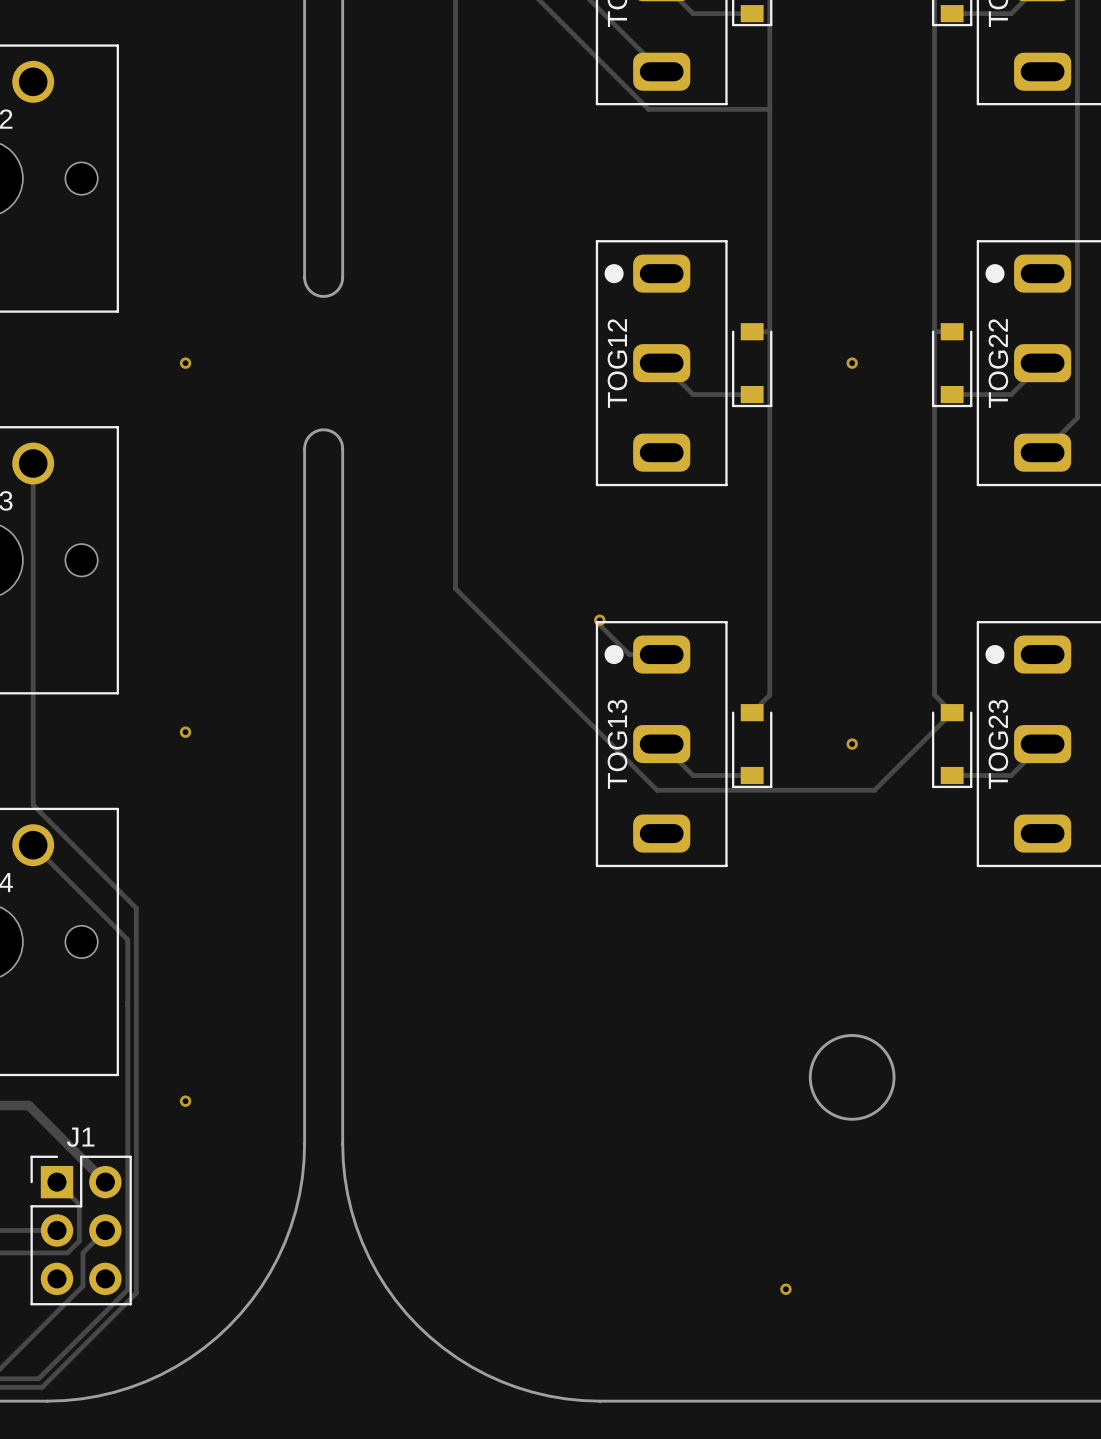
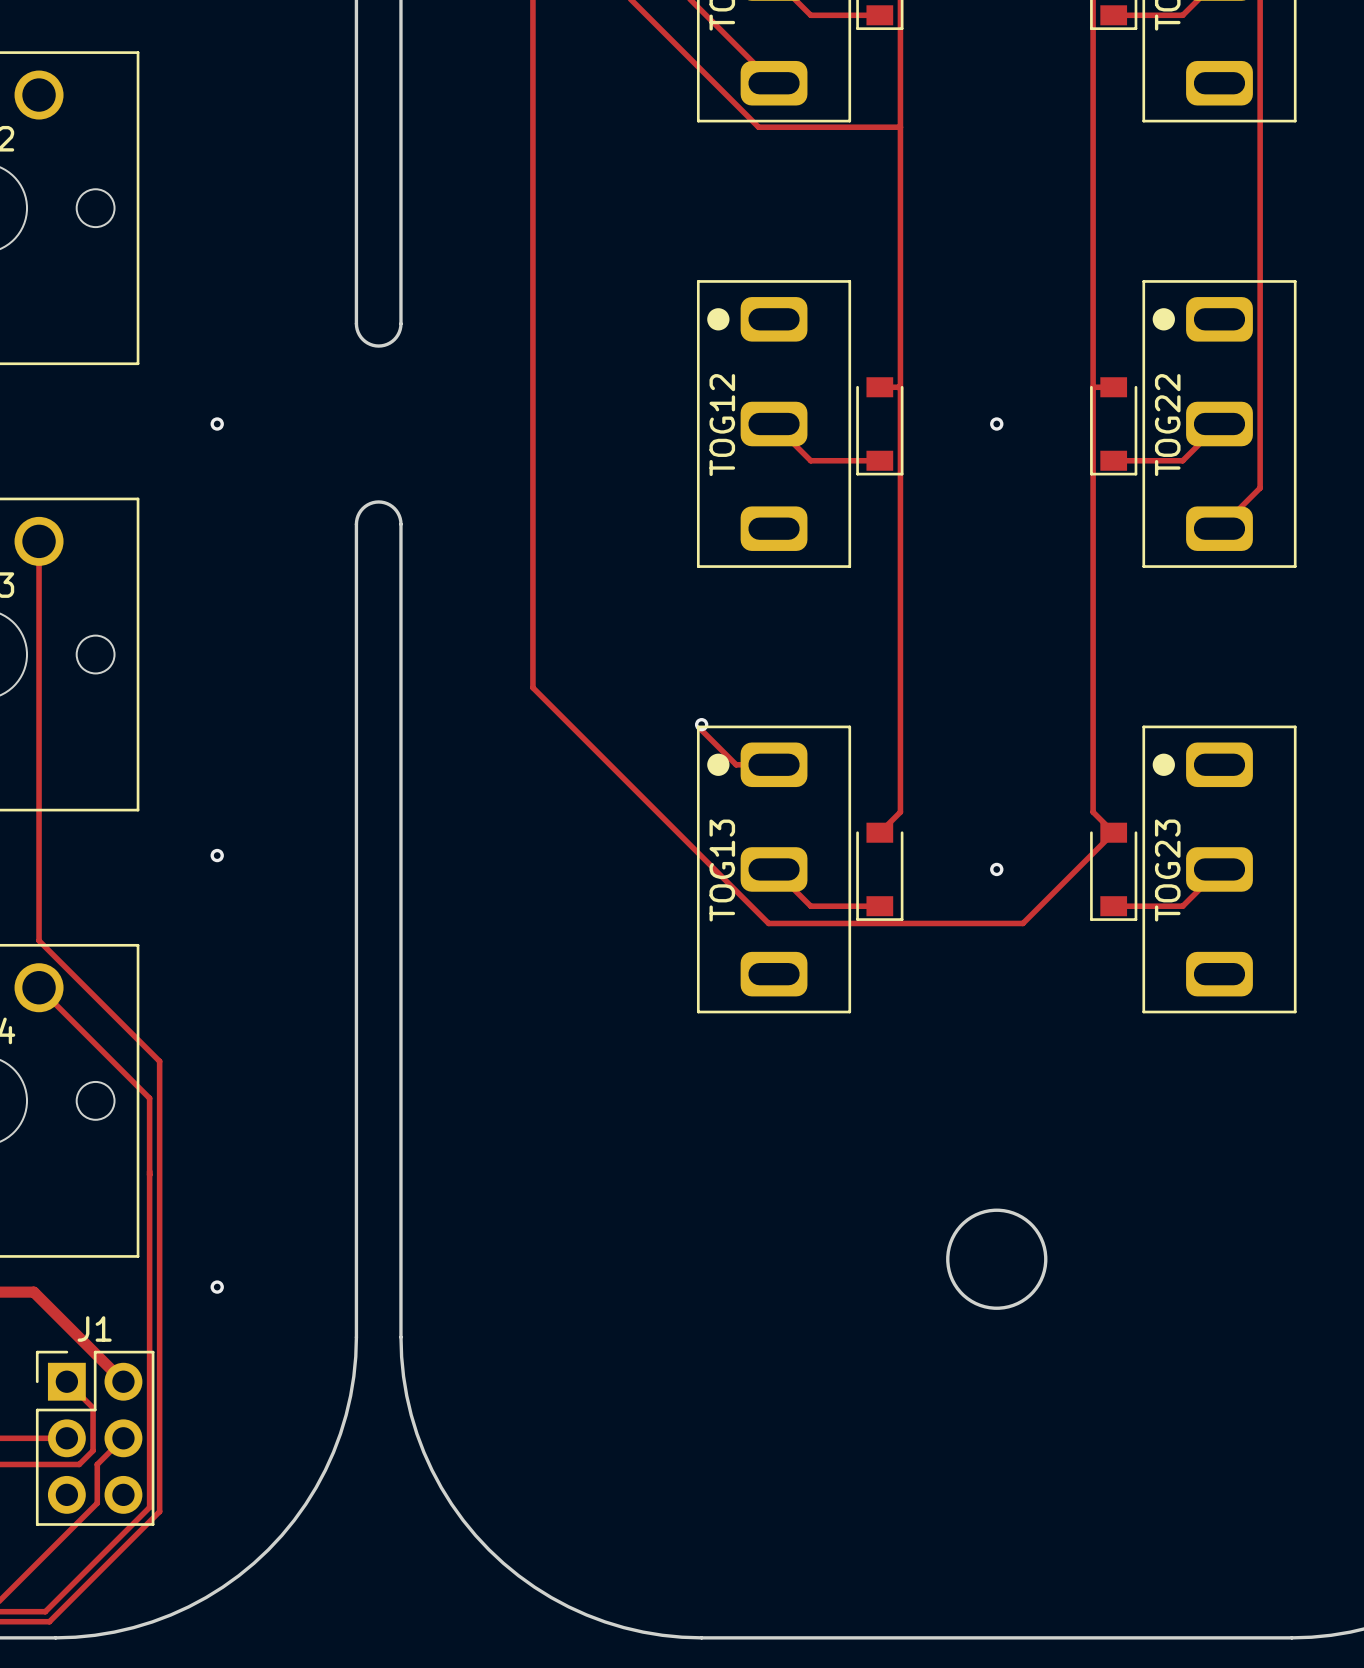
via: (785, 1289) -> none

